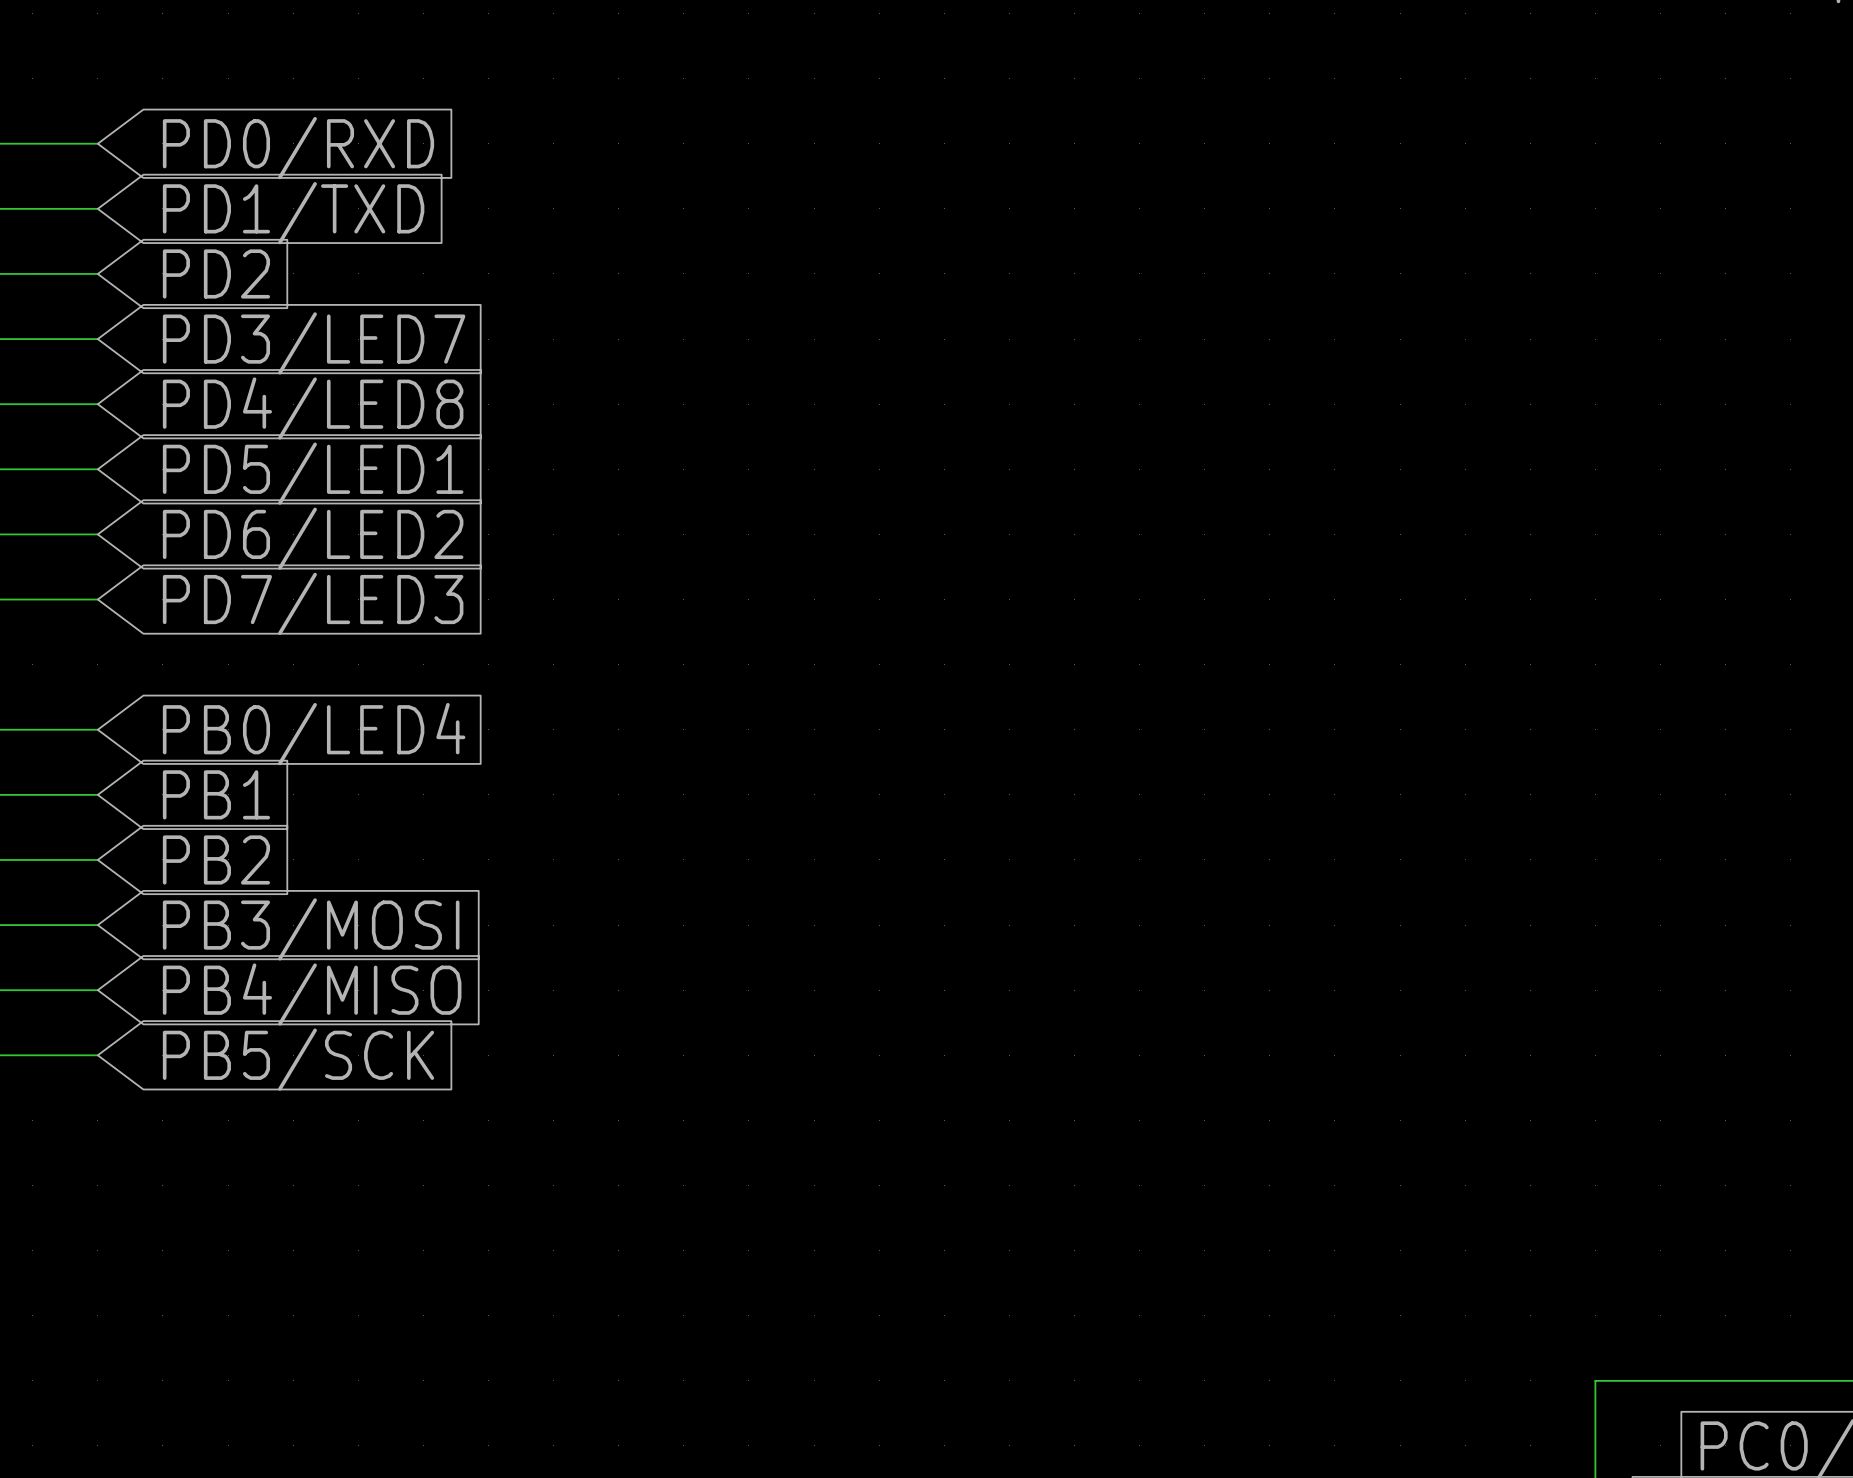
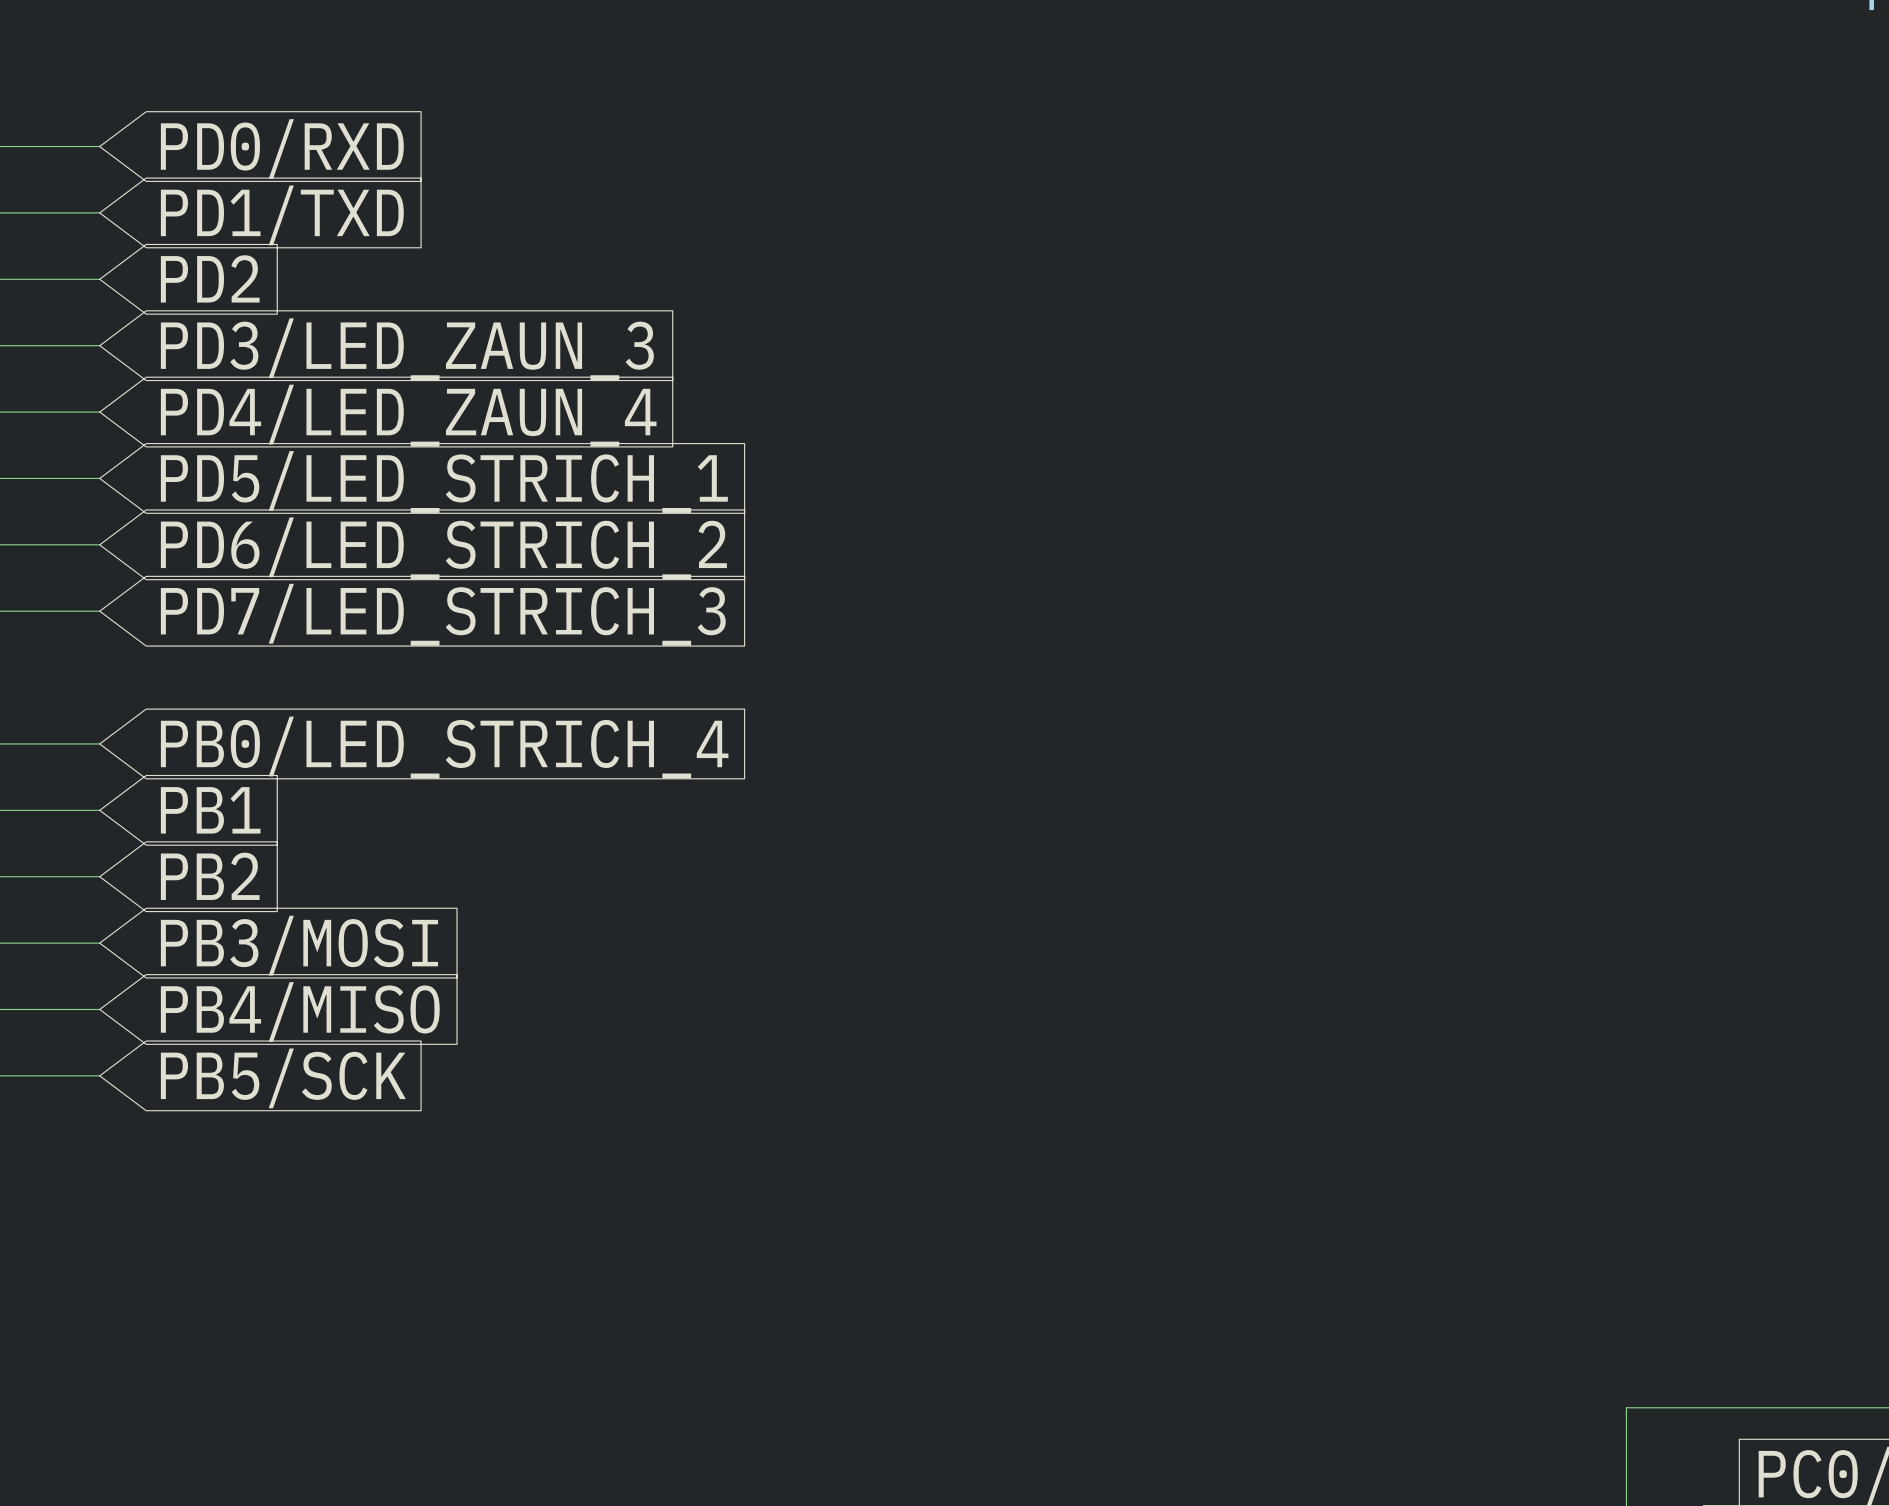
global label: PD3/LED7 (314, 343) -> PD3/LED_ZAUN_3 (407, 349)
global label: PD4/LED8 (313, 408) -> PD4/LED_ZAUN_4 (408, 415)
global label: PD5/LED1 (313, 473) -> PD5/LED_STRICH_1 (444, 482)
global label: PD6/LED2 (313, 538) -> PD6/LED_STRICH_2 (443, 548)
global label: PD7/LED3 (313, 603) -> PD7/LED_STRICH_3 (443, 614)
global label: PB0/LED4 (314, 734) -> PB0/LED_STRICH_4 (444, 747)

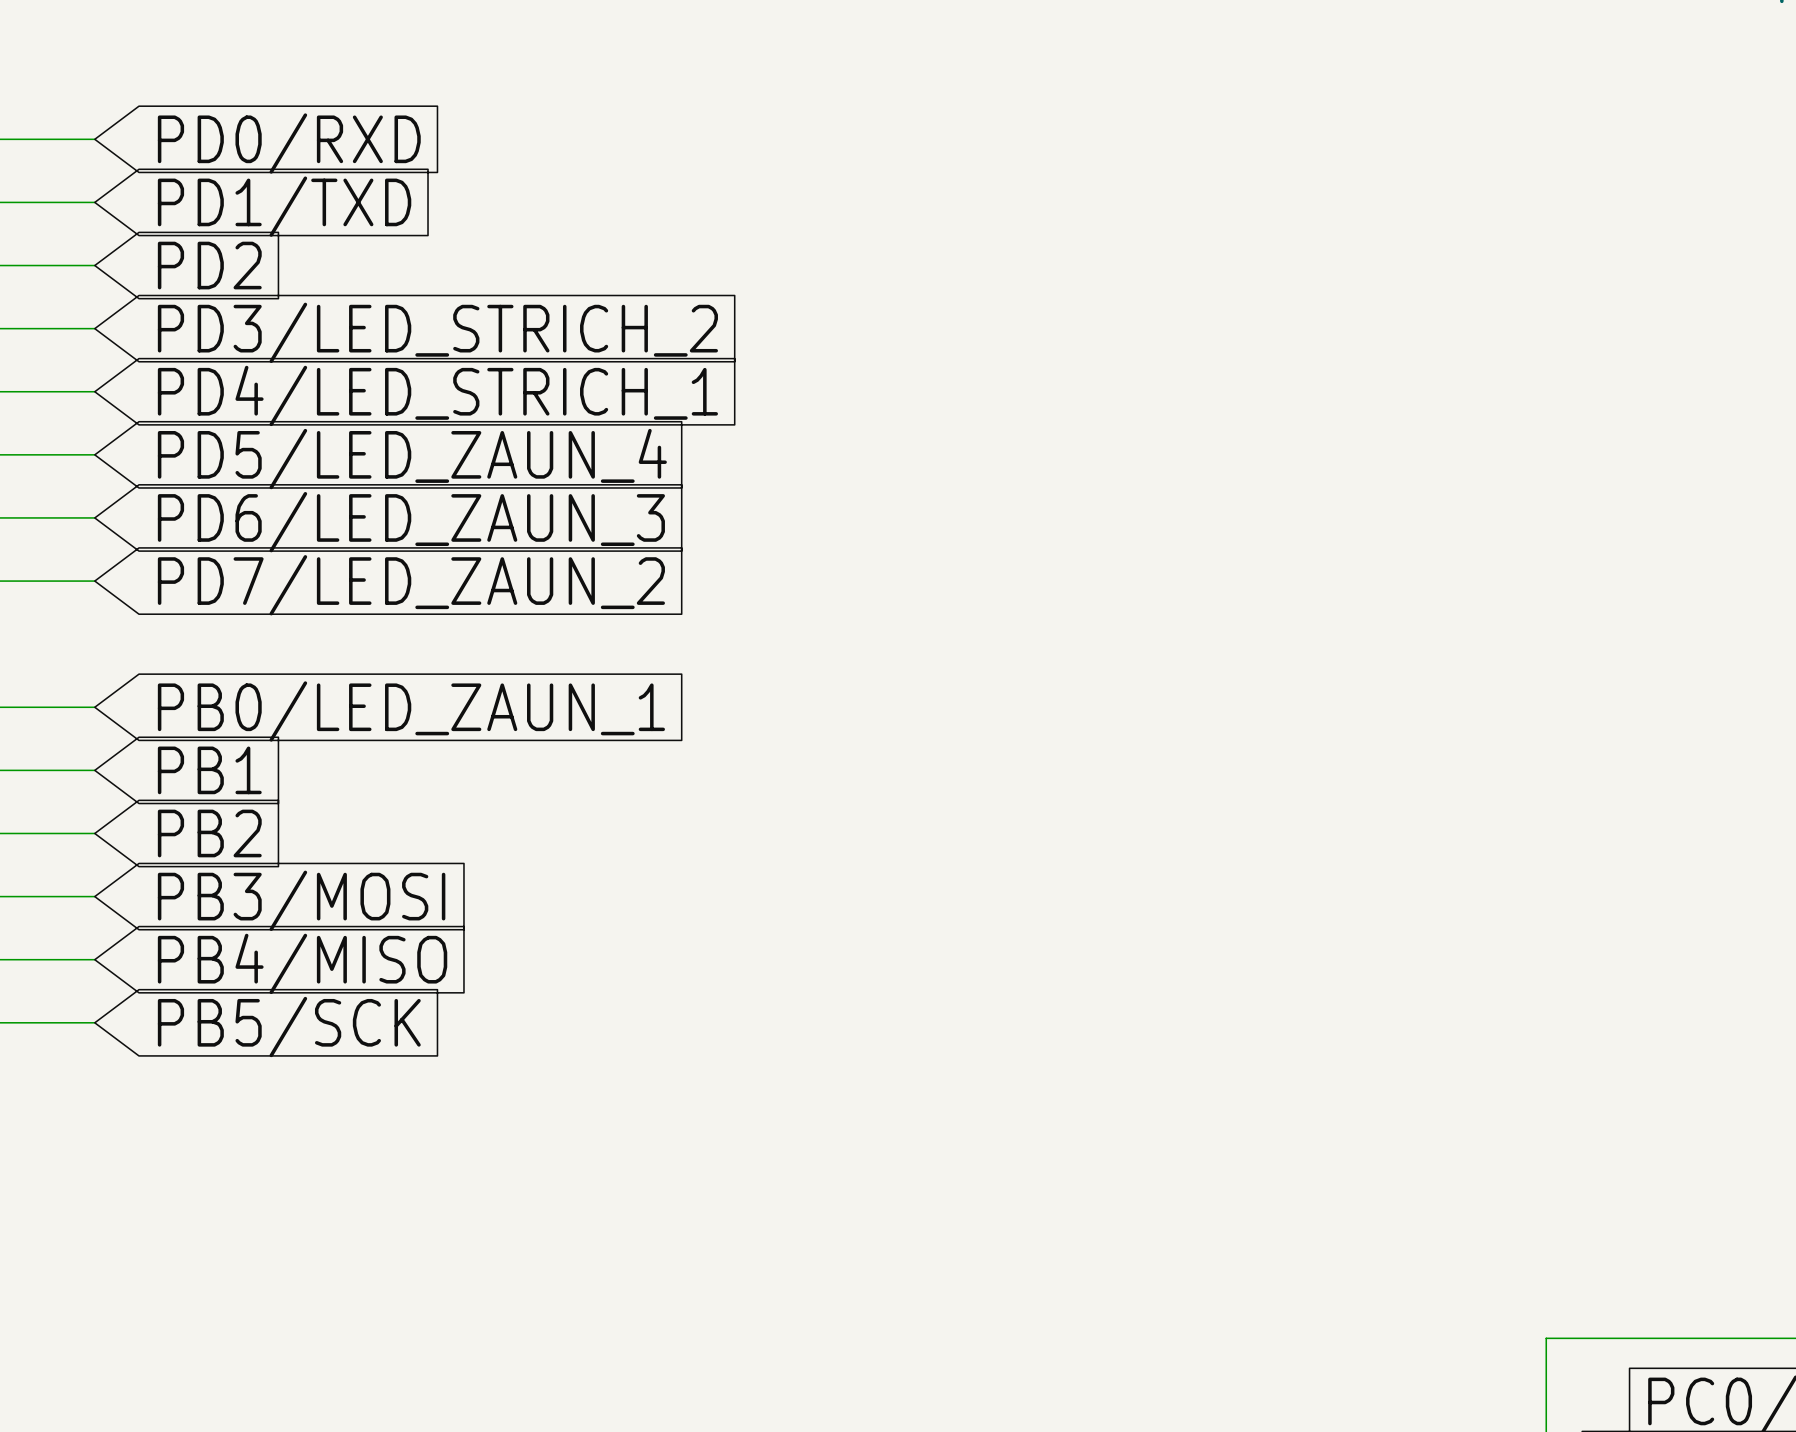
global label: PD3/LED_ZAUN_3 (407, 349) -> PD3/LED_STRICH_2 (437, 332)
global label: PD4/LED_ZAUN_4 (408, 415) -> PD4/LED_STRICH_1 (437, 395)
global label: PD5/LED_STRICH_1 (444, 482) -> PD5/LED_ZAUN_4 (412, 459)
global label: PD6/LED_STRICH_2 (443, 548) -> PD6/LED_ZAUN_3 (411, 522)
global label: PD7/LED_STRICH_3 (443, 614) -> PD7/LED_ZAUN_2 (411, 585)
global label: PB0/LED_STRICH_4 (444, 747) -> PB0/LED_ZAUN_1 (411, 711)

